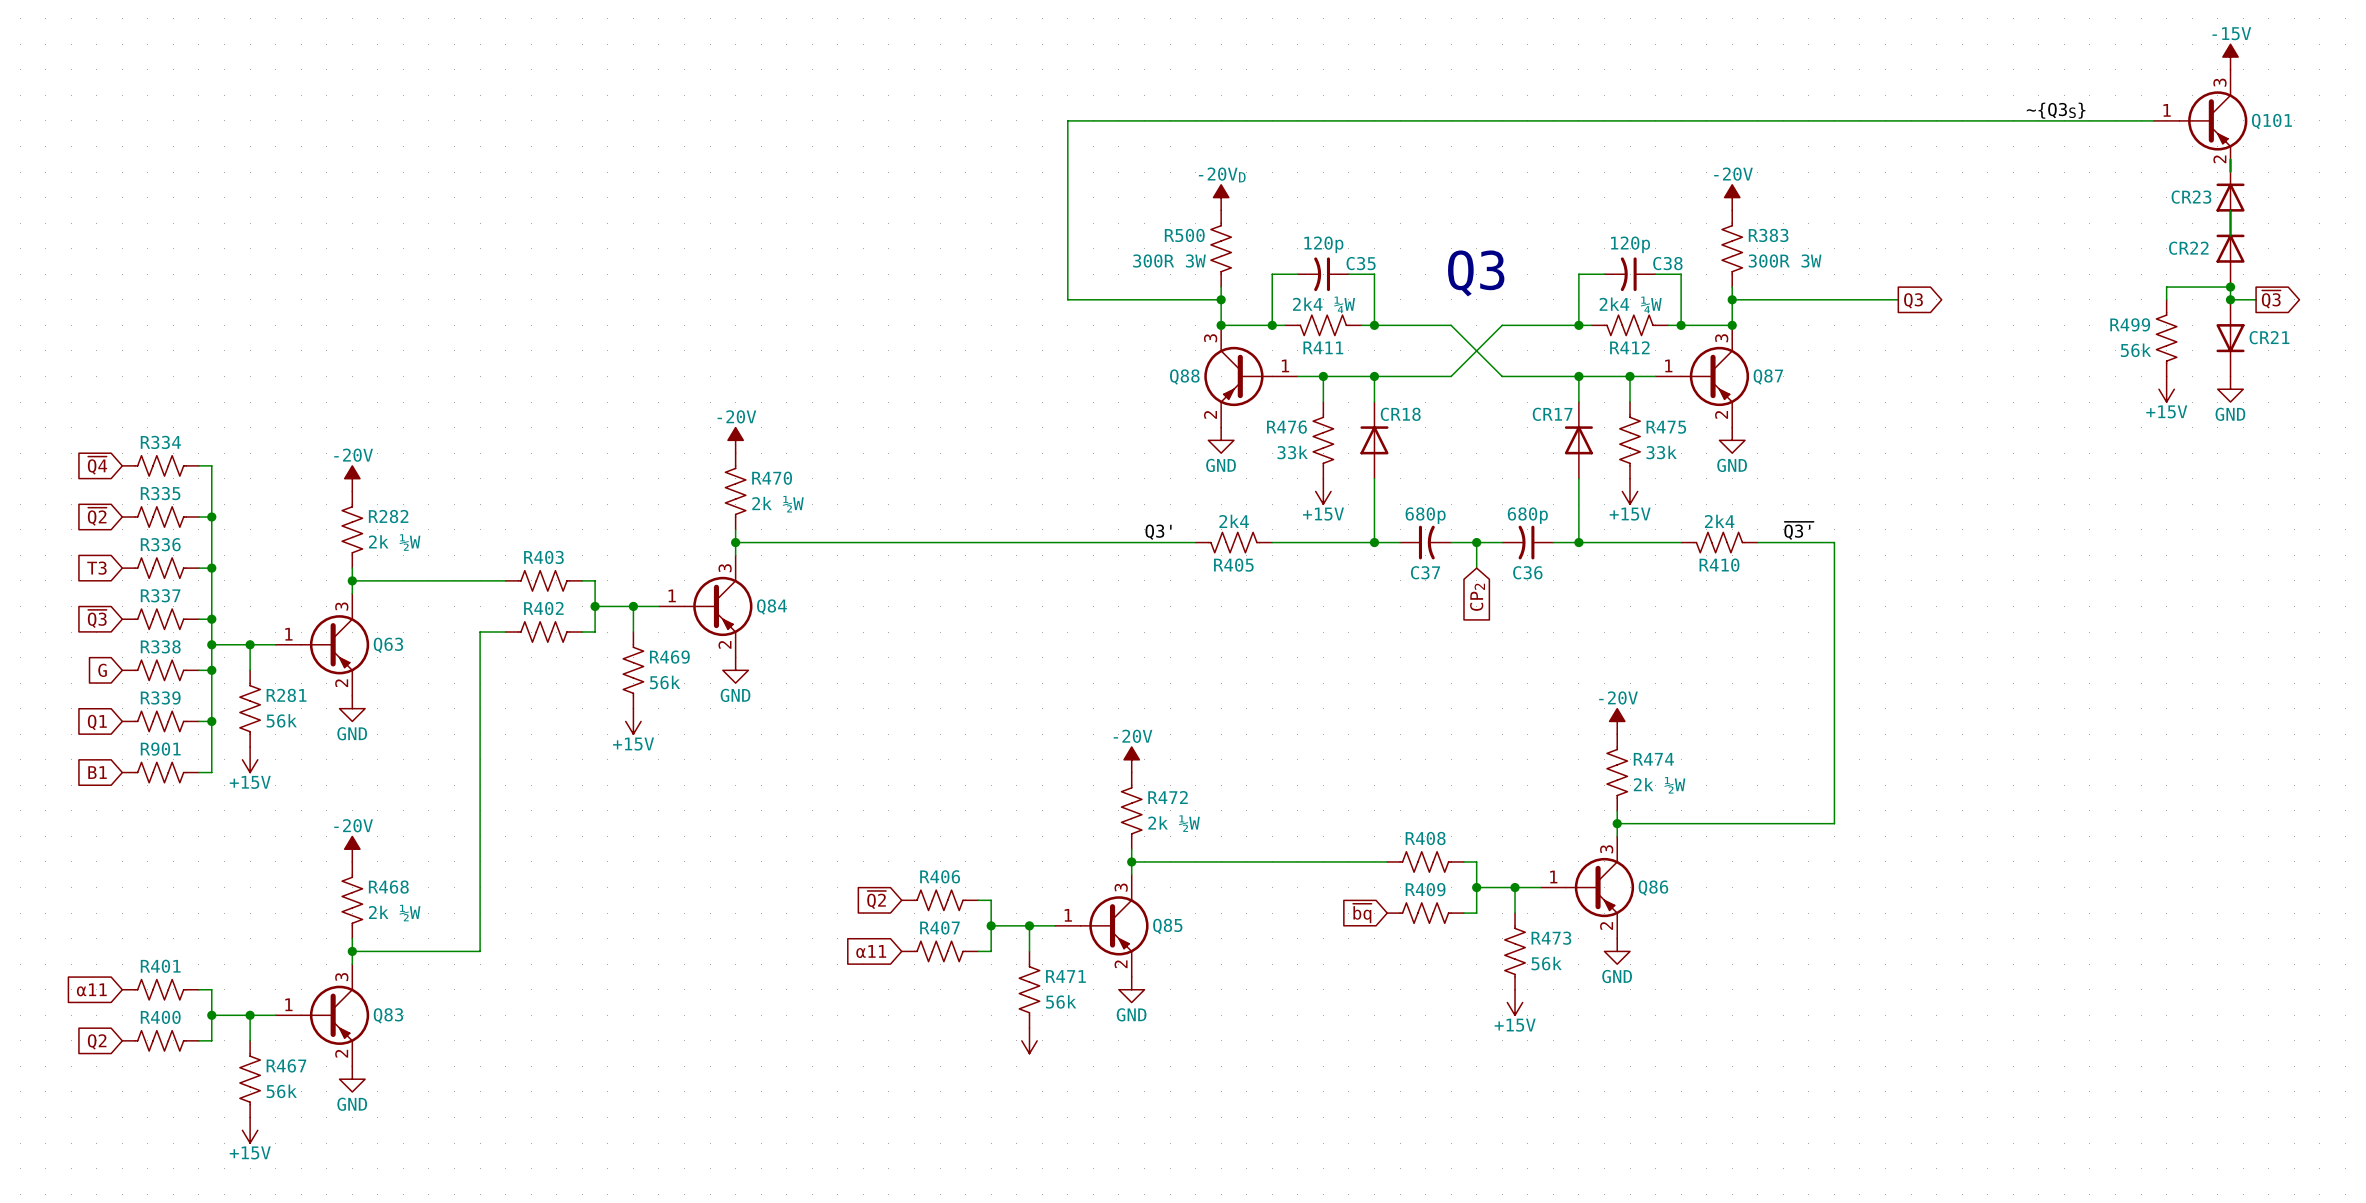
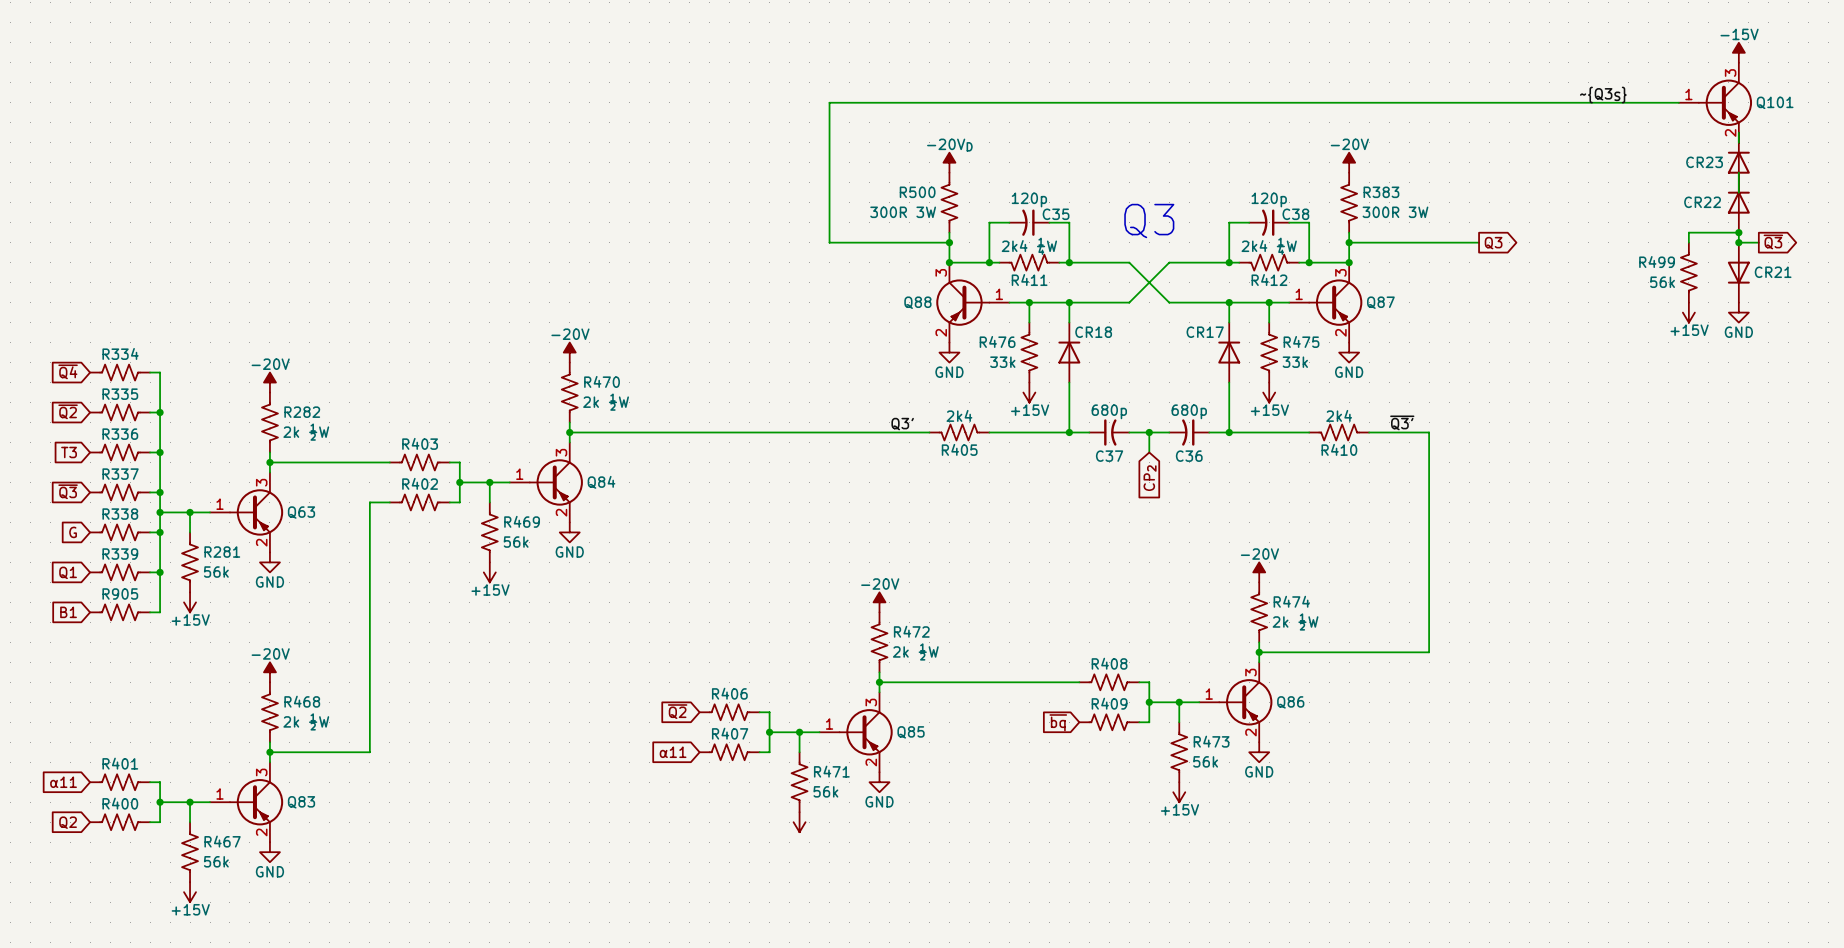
R901 name: R901 (160, 749) -> R905 (120, 594)

